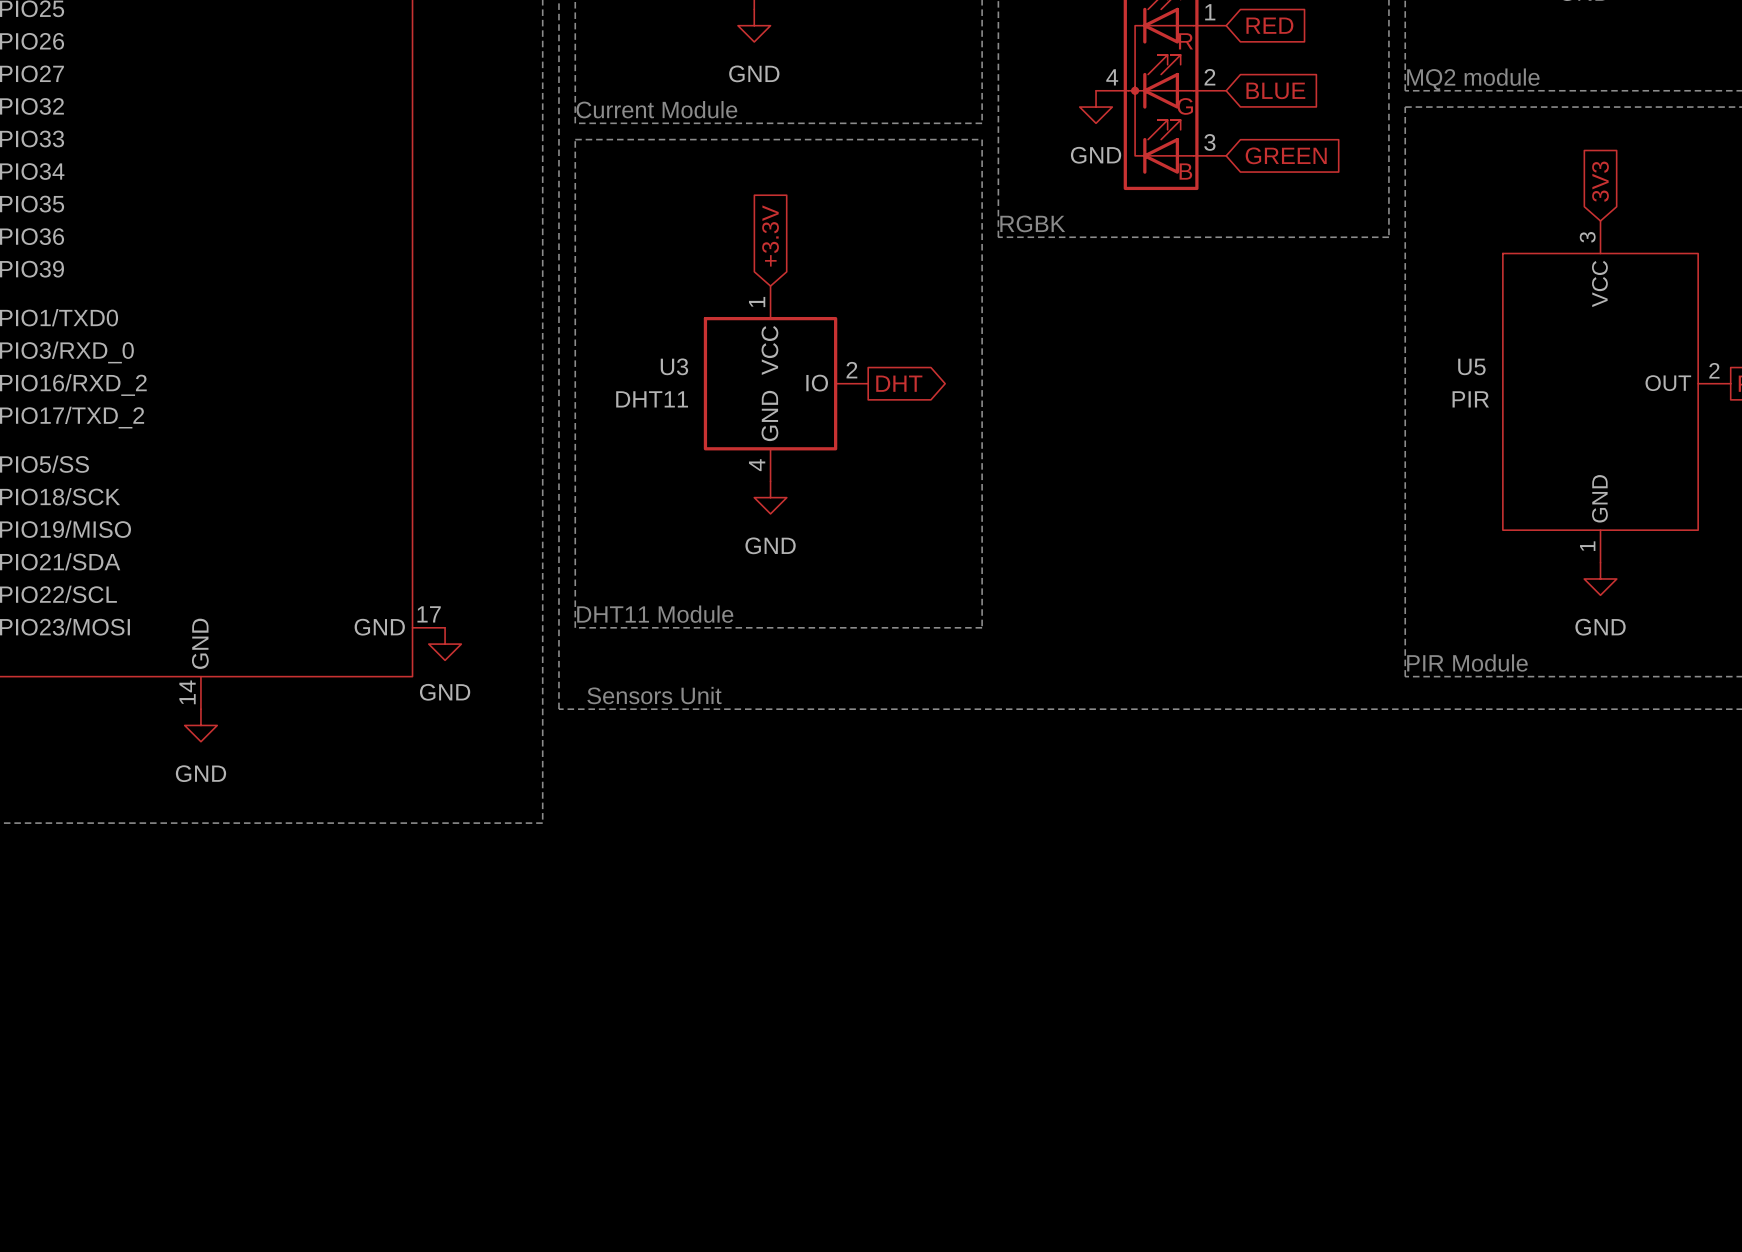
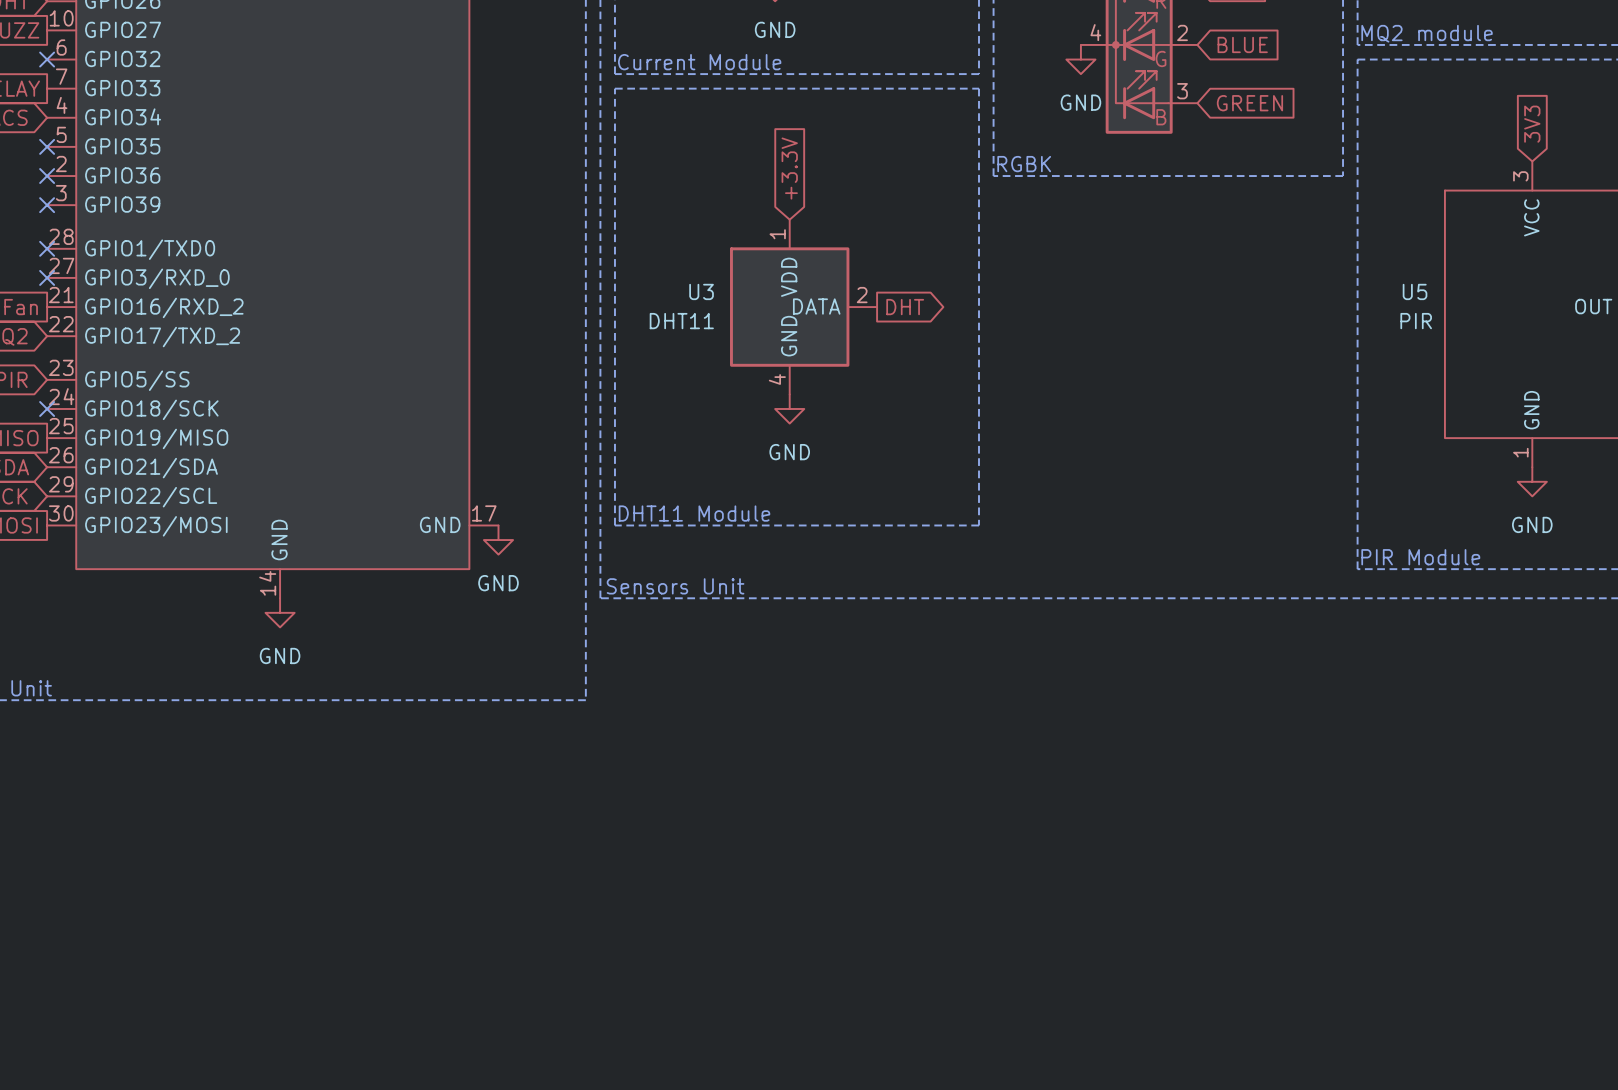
U3 pin name: VCC (769, 350) -> VDD (789, 277)
U3 pin name: IO (817, 383) -> DATA (816, 306)

